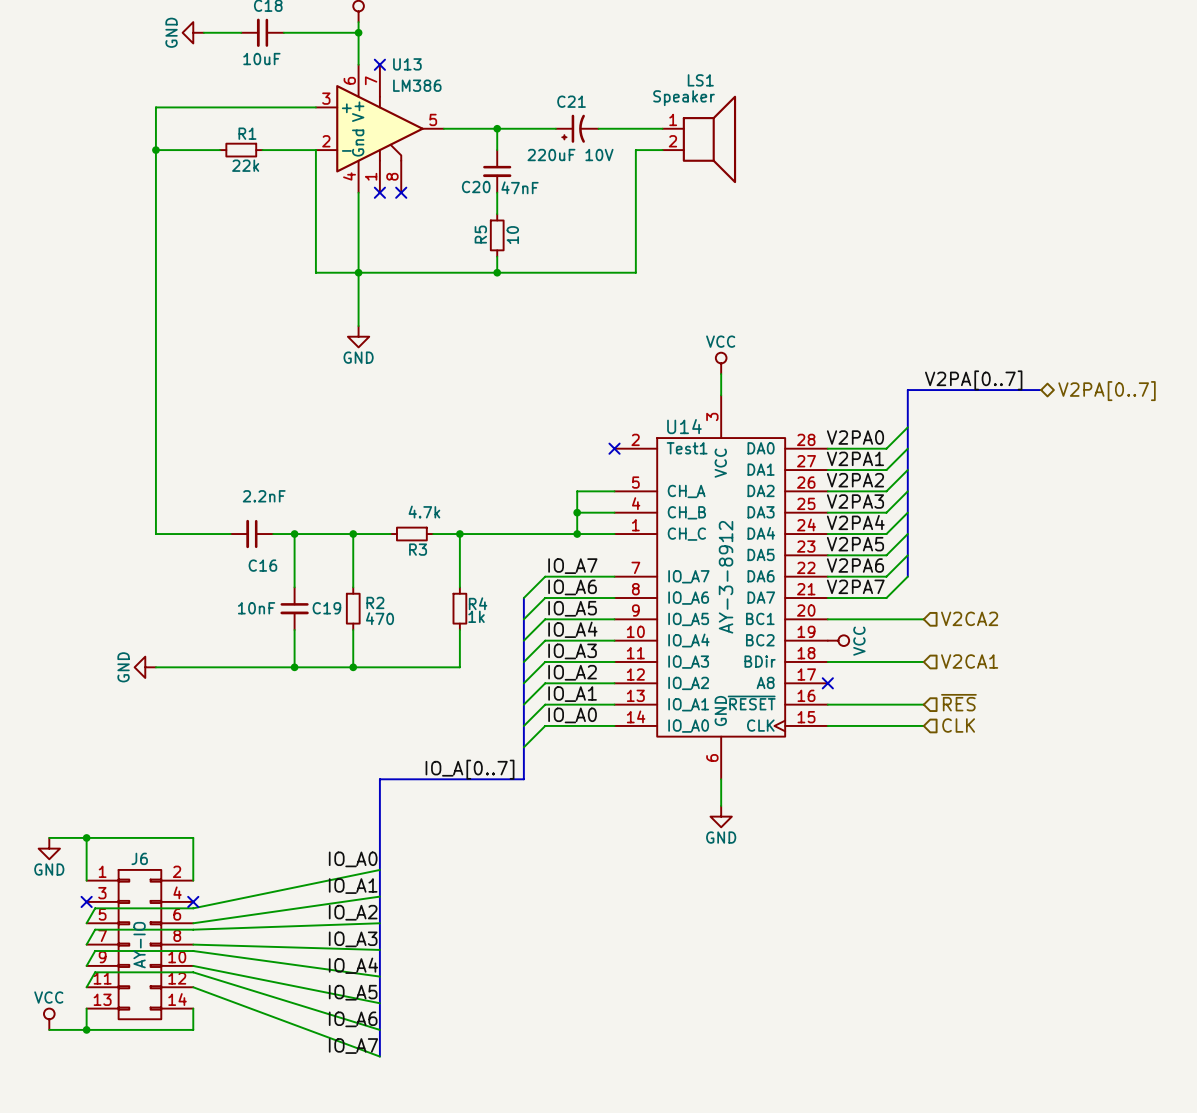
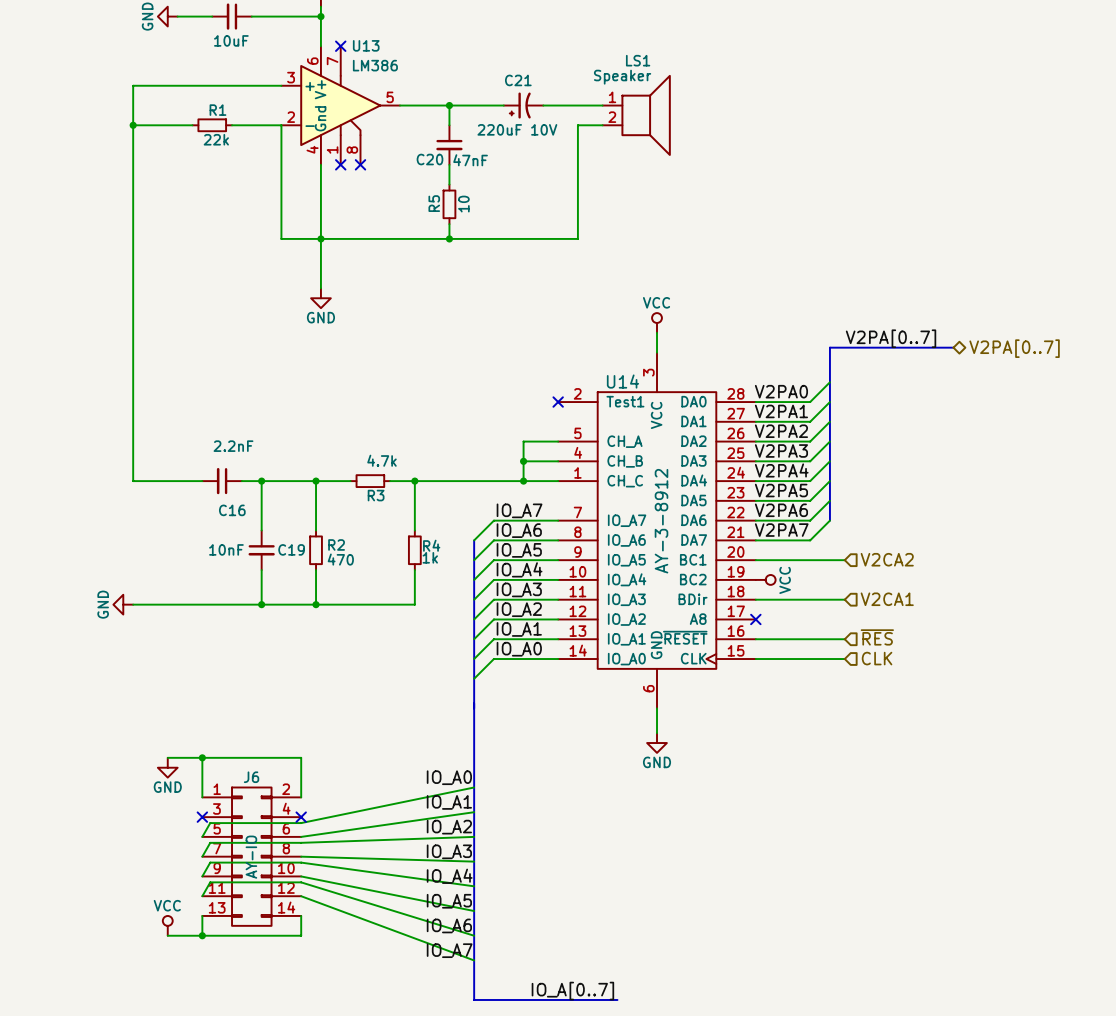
label: IO_A[0..7] (470, 769) -> none
bus: (523, 779) (379, 779) (379, 1056) -> (474, 708) (474, 999) (617, 999)
junction: none -> (202, 757)
wire: (49, 837) (193, 837) (193, 880) -> (167, 757) (301, 757) (301, 797)
wire: (86, 837) (86, 880) -> (202, 757) (202, 797)
junction: (86, 837) -> none
power symbol position: GND (49, 848) -> GND (167, 767)
label position: IO_A0 (353, 859) -> IO_A0 (449, 777)
wire: (379, 869) (193, 908) (95, 908) (86, 923) -> (474, 787) (301, 823) (210, 823) (202, 836)
label position: IO_A1 (353, 886) -> IO_A1 (449, 802)
no-connect mark: none -> (301, 817)
wire: (379, 896) (193, 923) -> (474, 812) (301, 836)
no-connect mark: (86, 901) -> none
no-connect mark position: (193, 901) -> (202, 817)
label position: IO_A2 (353, 912) -> IO_A2 (449, 827)
wire: (379, 923) (193, 929) (95, 929) (86, 944) -> (474, 836) (301, 842) (210, 842) (202, 856)
label position: IO_A3 (353, 939) -> IO_A3 (449, 851)
J6 position: (139, 944) -> (251, 856)
wire: (193, 944) (379, 949) -> (301, 856) (474, 861)
wire: (86, 965) (95, 951) (193, 951) (379, 976) -> (202, 876) (210, 862) (301, 862) (474, 886)
wire: (193, 965) (379, 1003) -> (301, 876) (474, 911)
label position: IO_A4 (353, 965) -> IO_A4 (449, 876)
wire: (86, 987) (95, 972) (193, 972) (379, 1029) -> (202, 896) (210, 882) (301, 882) (474, 935)
wire: (193, 987) (379, 1056) -> (301, 896) (474, 960)
label position: IO_A5 (353, 992) -> IO_A5 (449, 901)
wire: (86, 1008) (86, 1029) -> (202, 915) (202, 935)
wire: (193, 1008) (193, 1029) (49, 1029) -> (301, 915) (301, 935) (167, 935)
power symbol position: VCC (49, 1019) -> VCC (167, 925)
label position: IO_A6 (353, 1019) -> IO_A6 (449, 925)
junction: none -> (202, 935)
junction: (86, 1029) -> none
label position: IO_A7 (353, 1046) -> IO_A7 (449, 950)
label: none -> IO_A[0..7] (572, 991)

